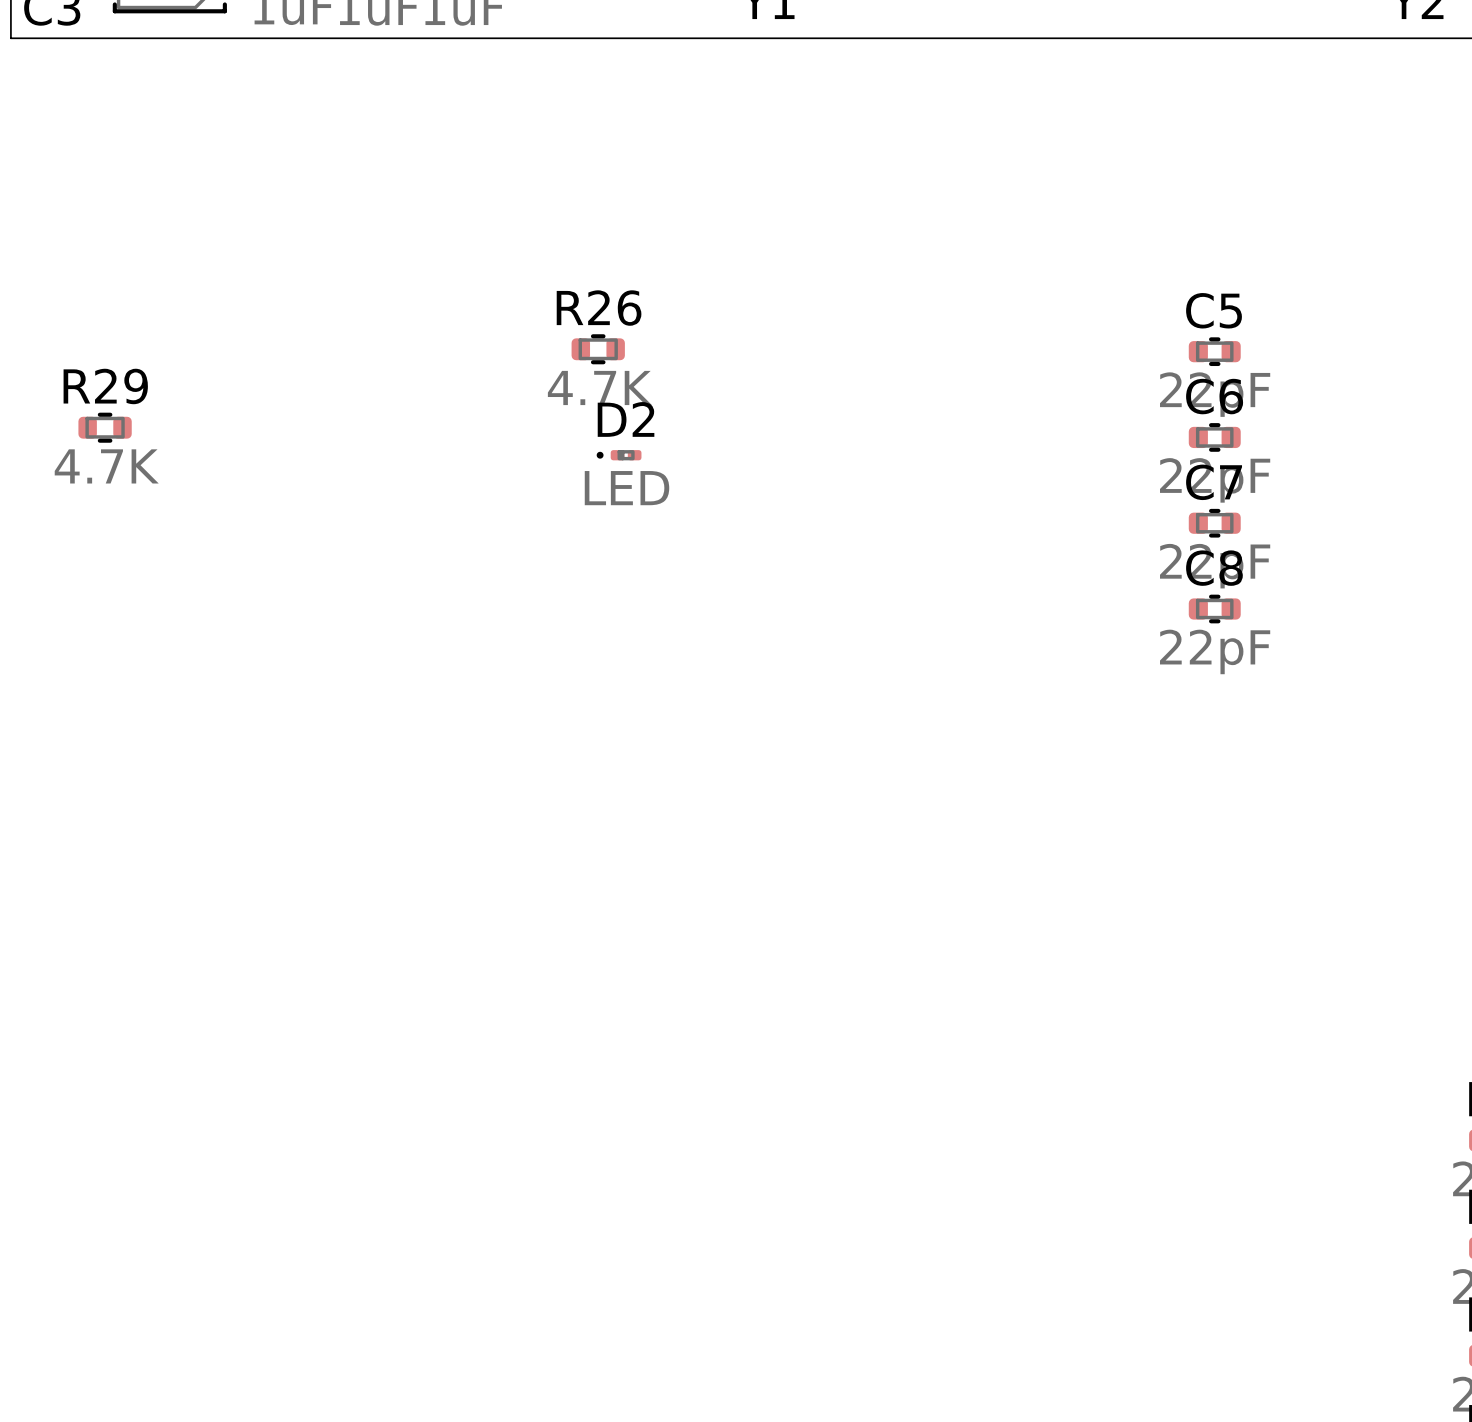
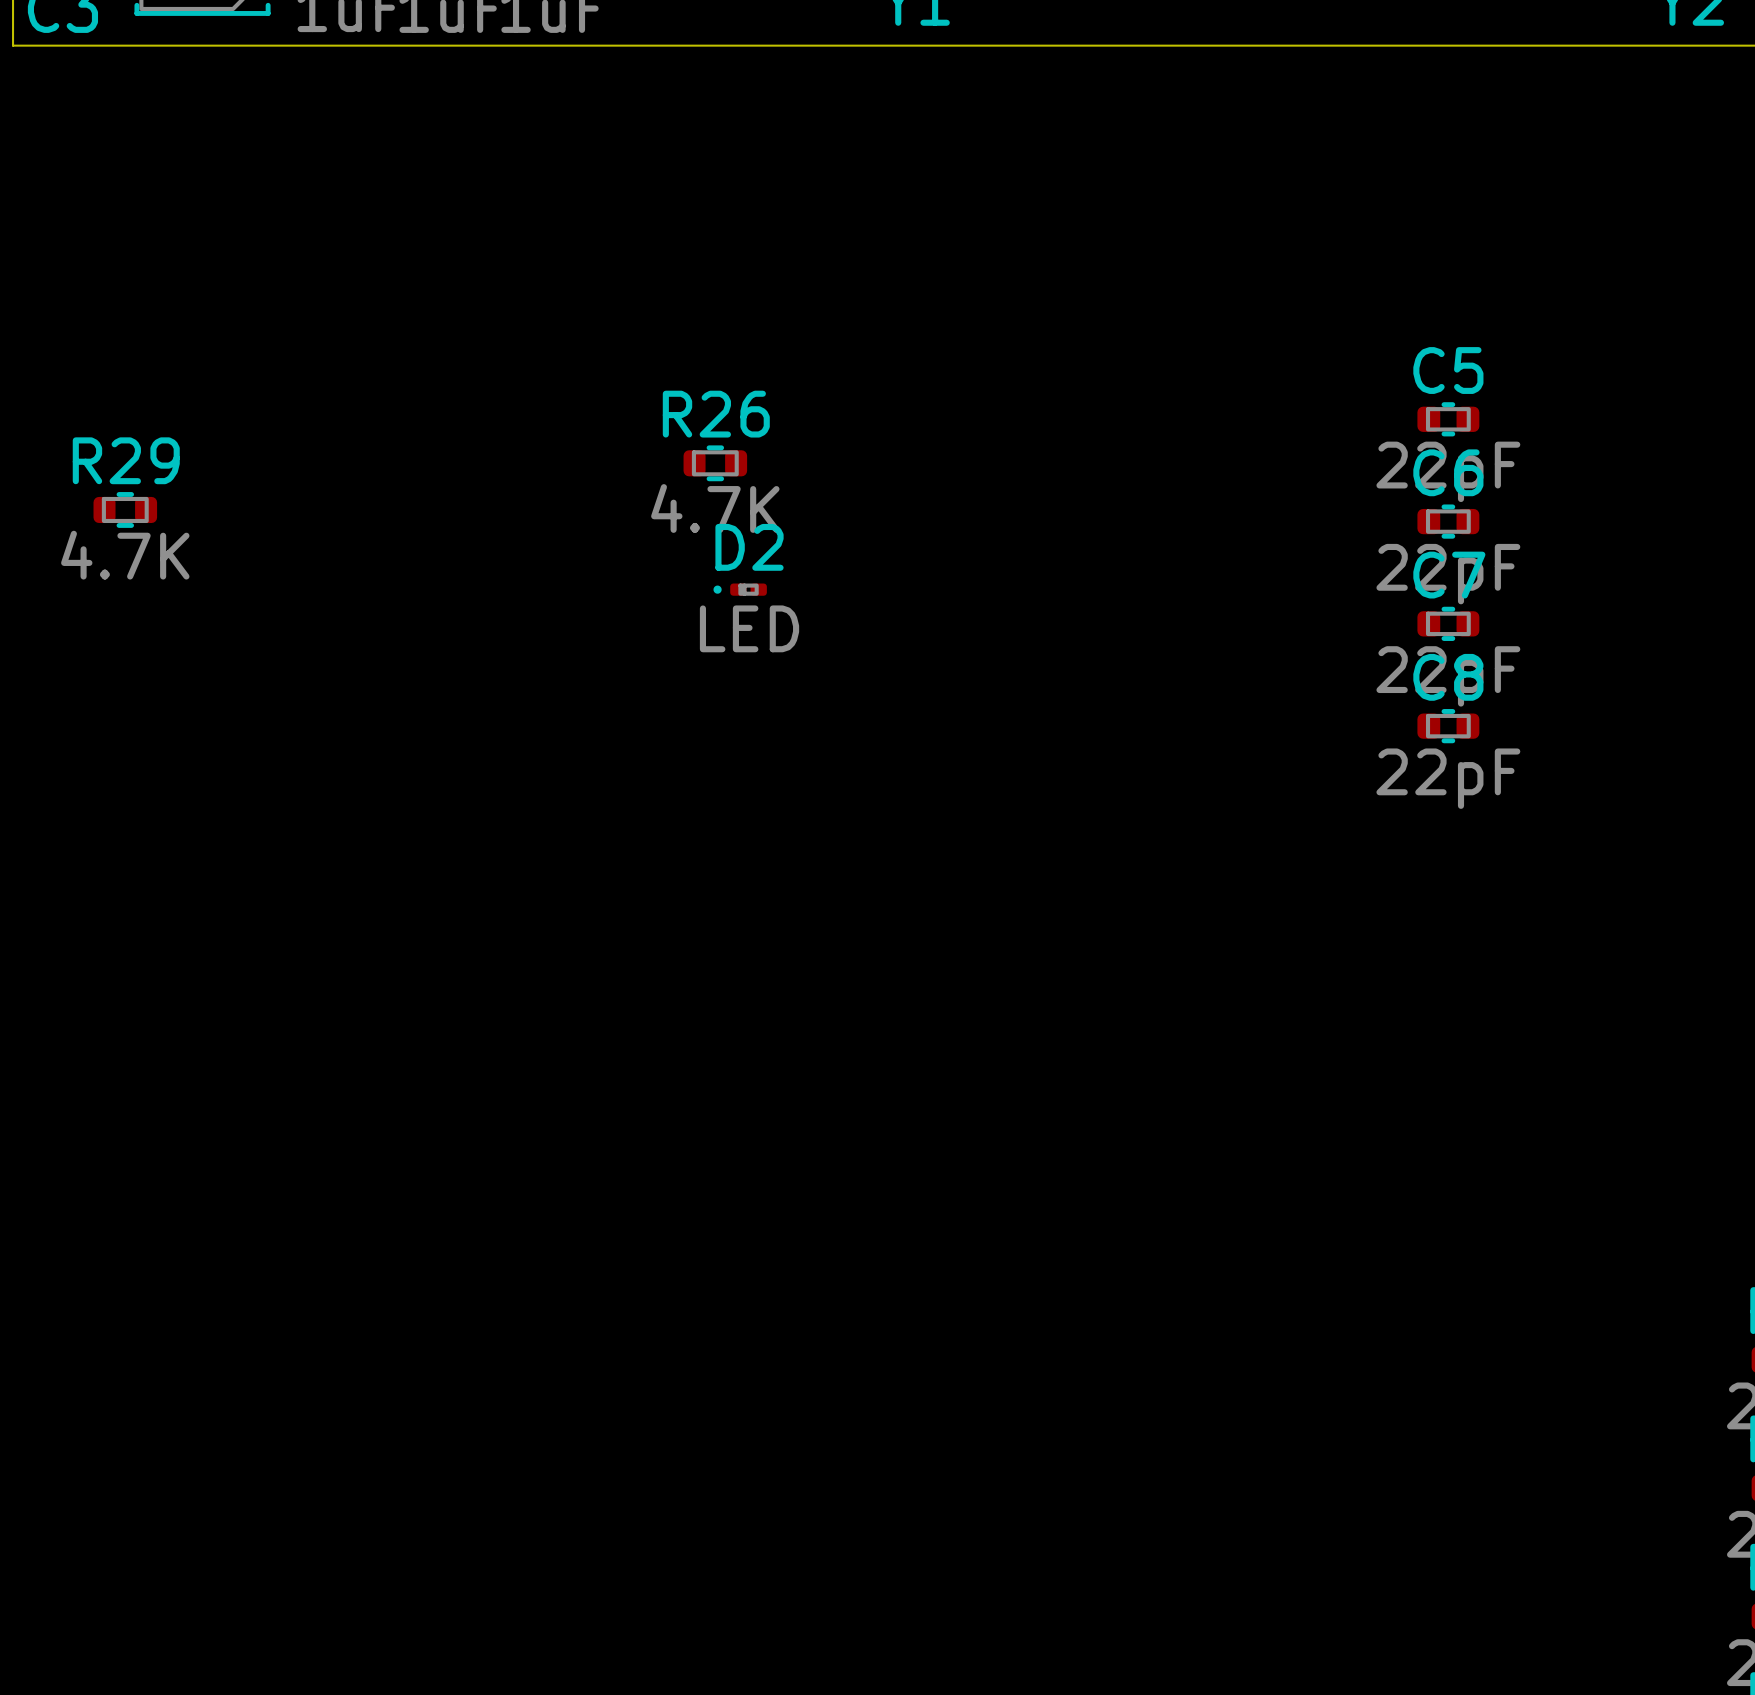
R26 position: (598, 349) -> (715, 463)
D2 position: (619, 455) -> (740, 589)

